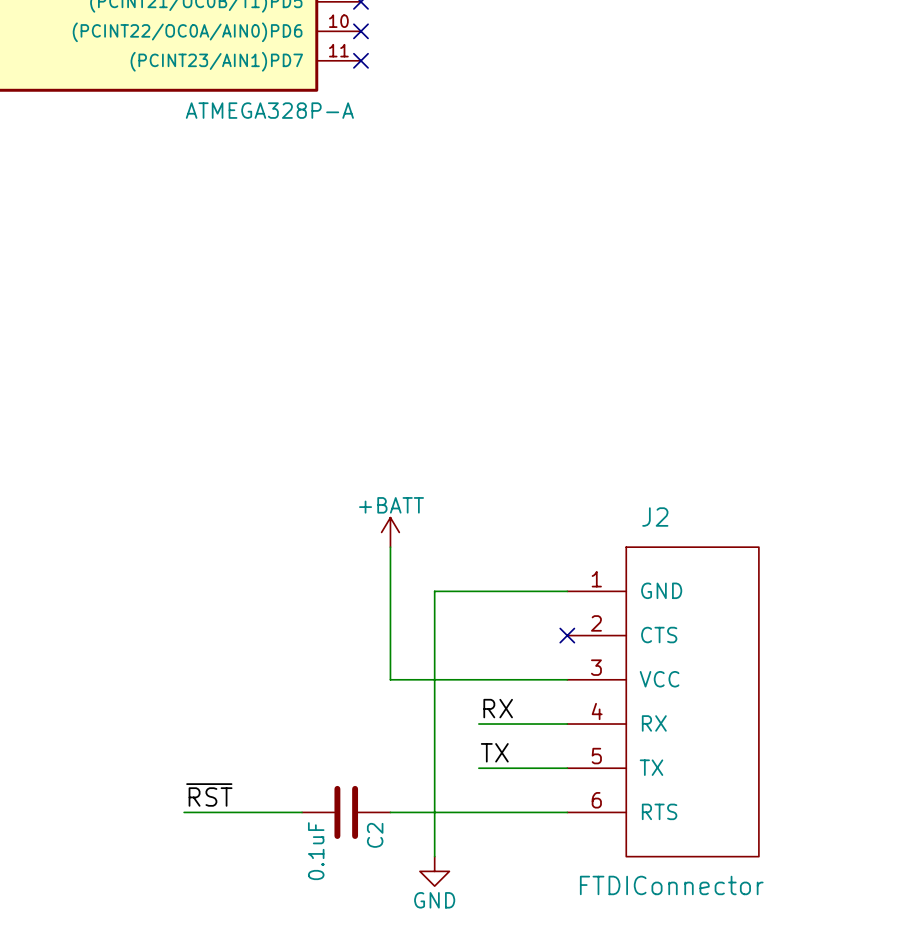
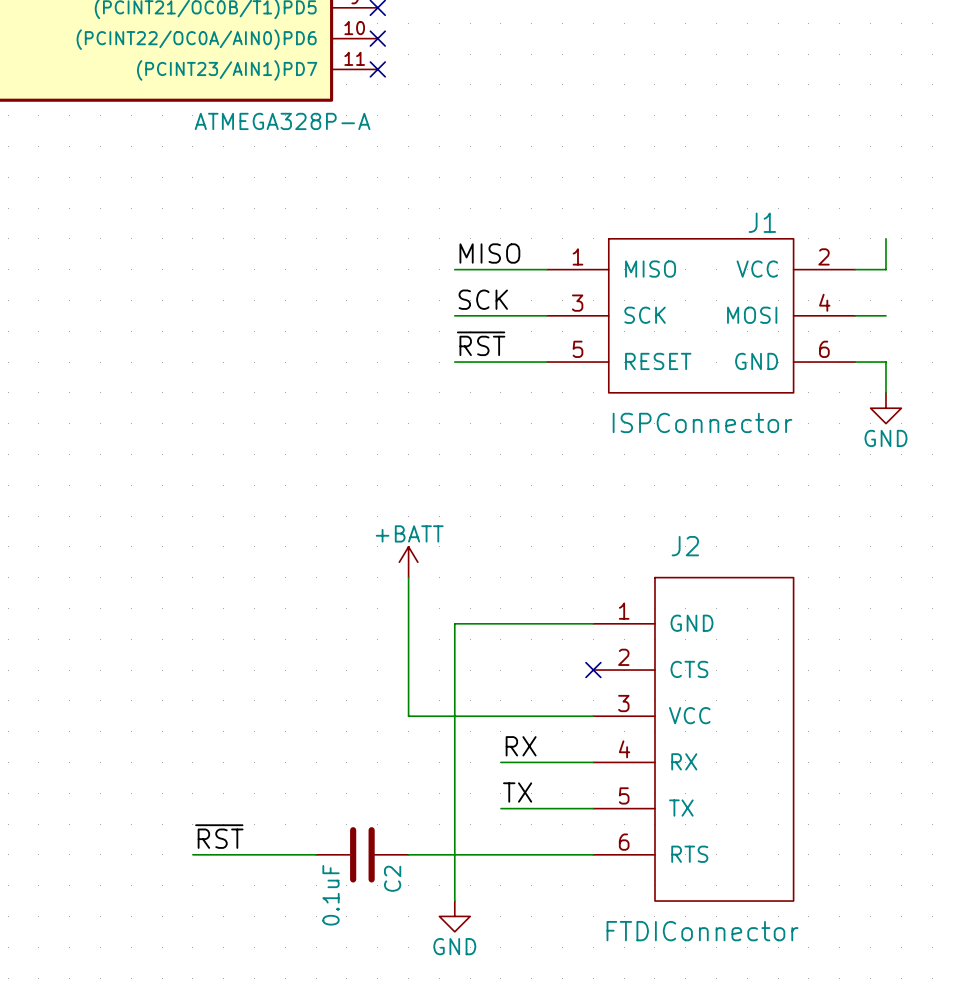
wire: none -> (885, 238) (885, 269) (855, 269)
label: none -> MISO (489, 253)
wire: none -> (454, 269) (547, 269)
label: none -> SCK (483, 299)
wire: none -> (454, 315) (547, 315)
J1: none -> ISPConnector (701, 315)
wire: none -> (855, 315) (885, 315)
label: none -> ~{RST} (481, 343)
wire: none -> (454, 362) (547, 362)
wire: none -> (855, 362) (885, 362) (885, 392)
power symbol: none -> GND (885, 408)

